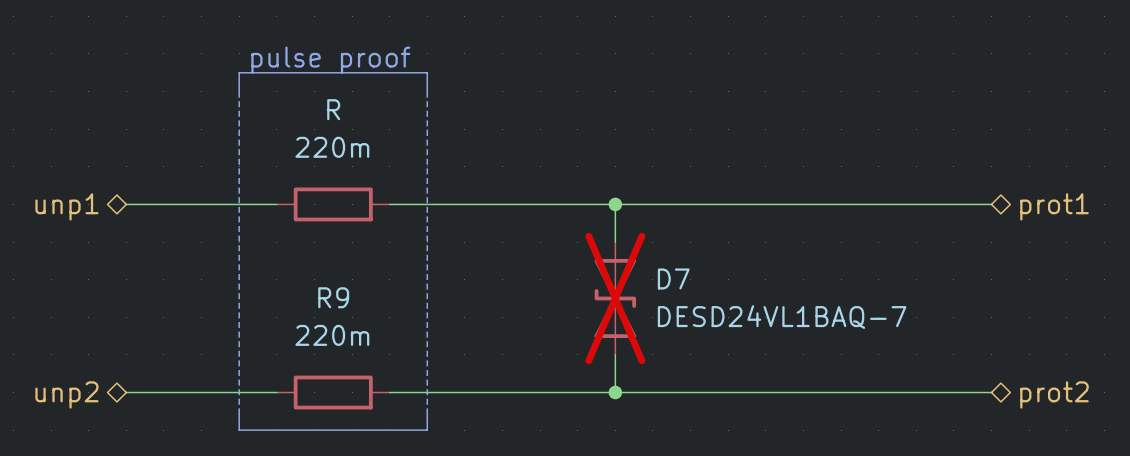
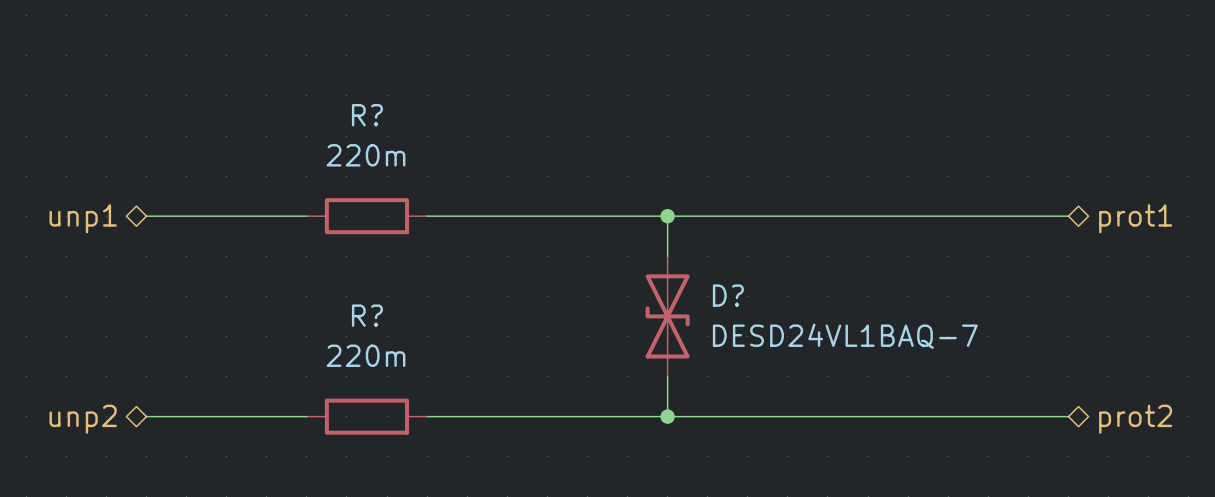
text: pulse proof (330, 60) -> none
line: (239, 72) (239, 430) (427, 430) (427, 72) (239, 72) -> none
R name: R (333, 109) -> R? (367, 115)
D7 name: D7 (673, 278) -> D? (728, 295)
R9 name: R9 (333, 297) -> R? (367, 315)
D7 do-not-place cross: (615, 298) -> none

